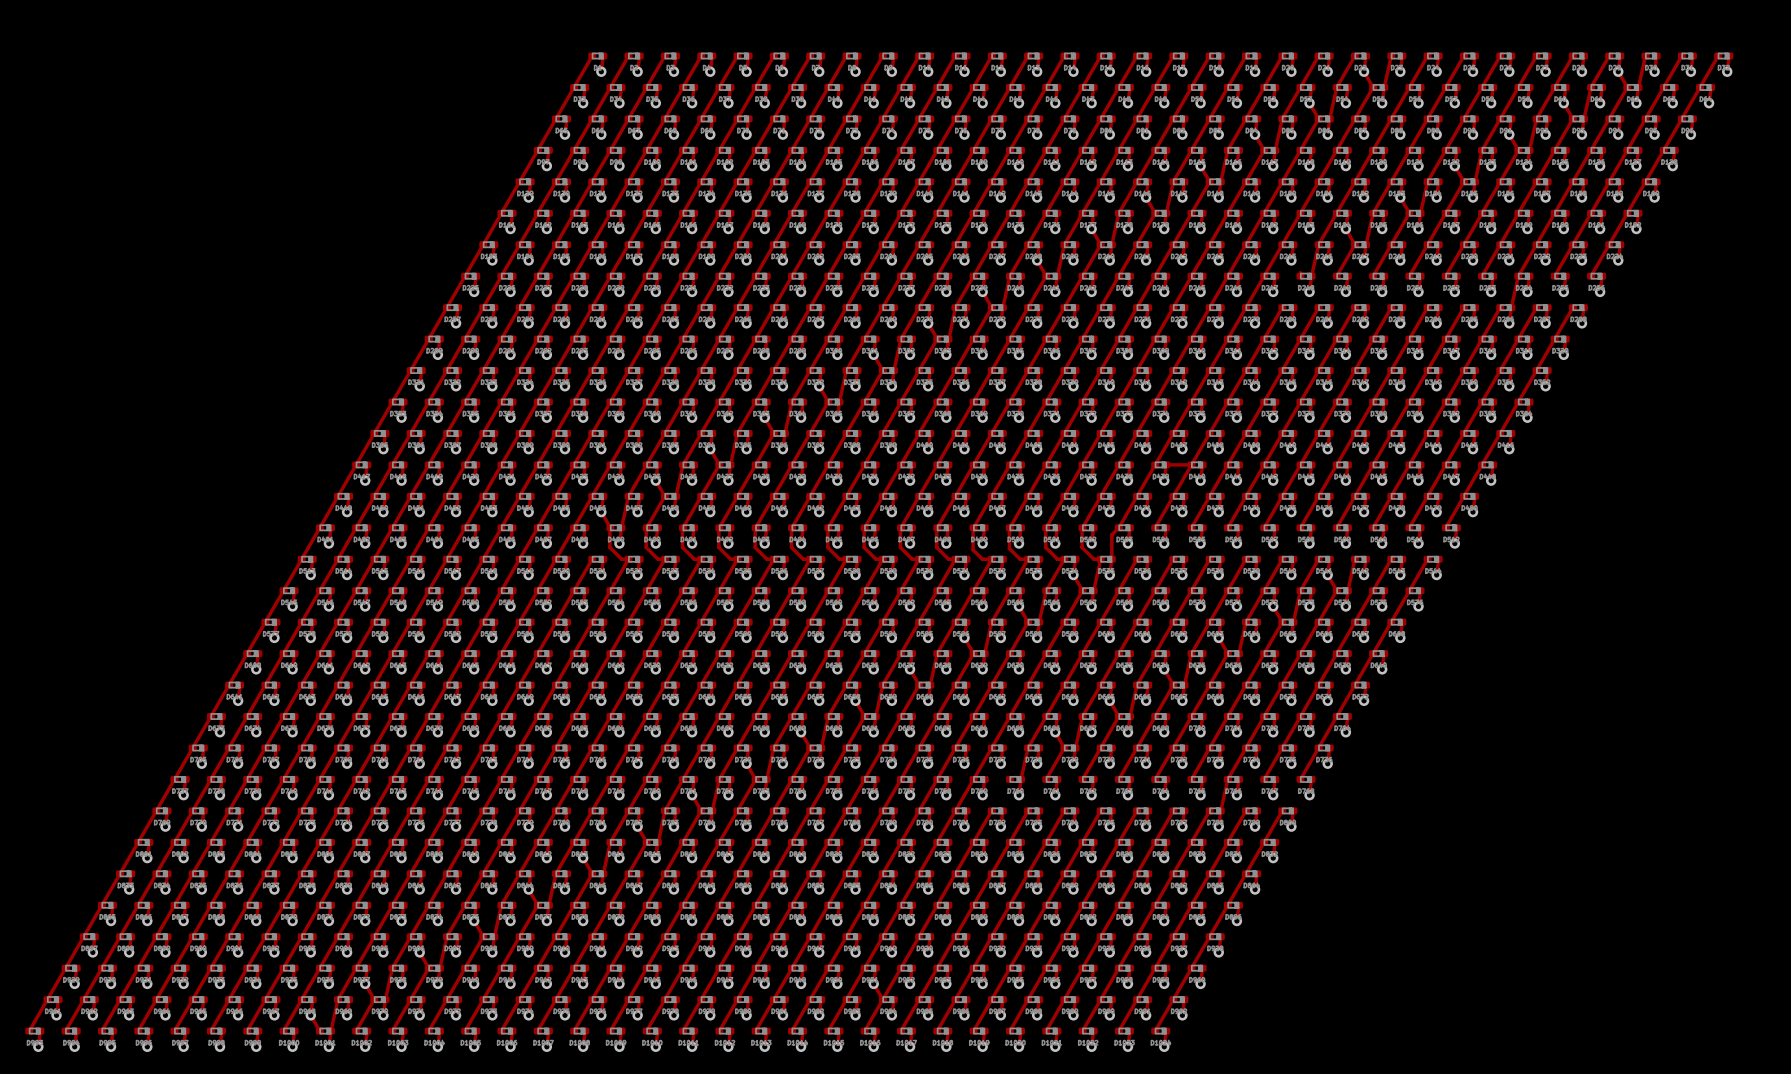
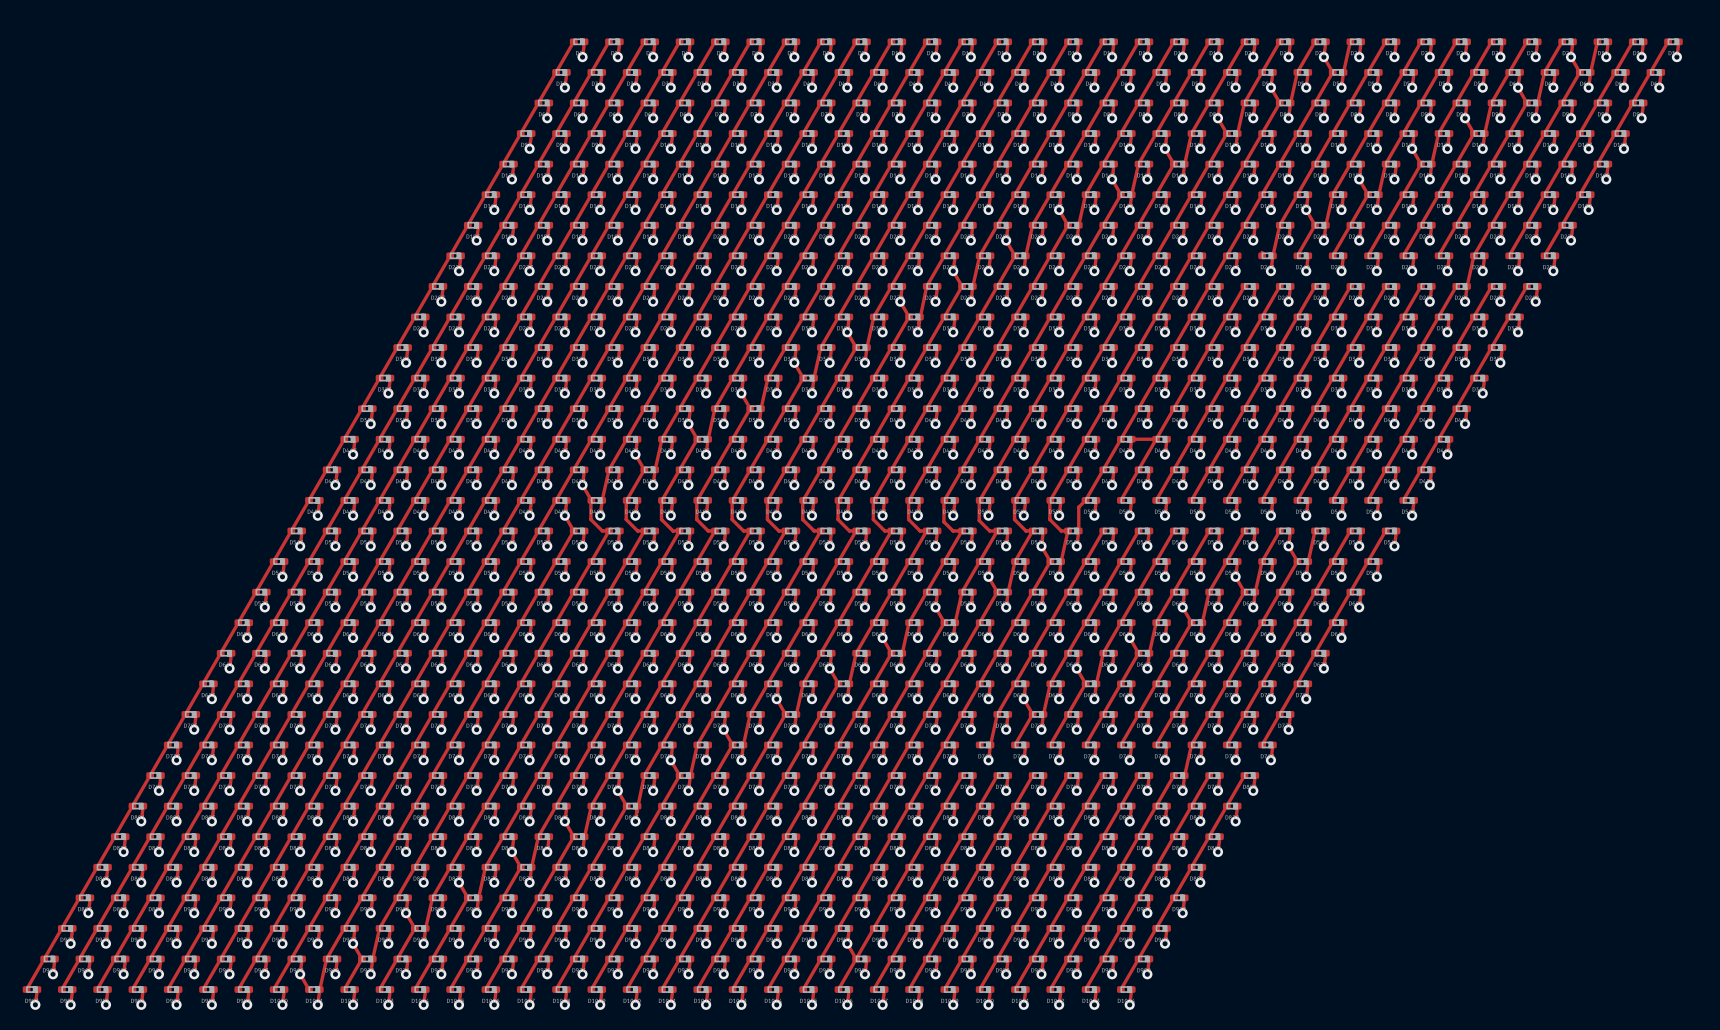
track: none -> (564, 515) (573, 530)

